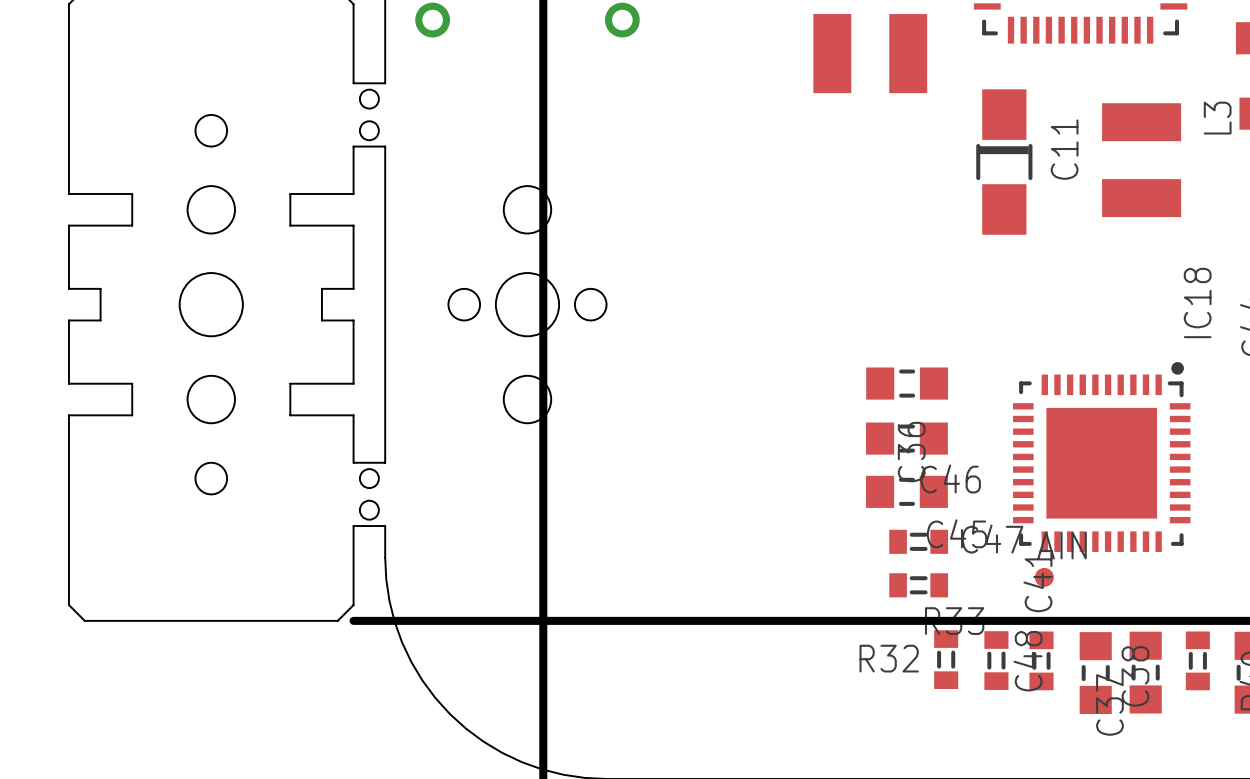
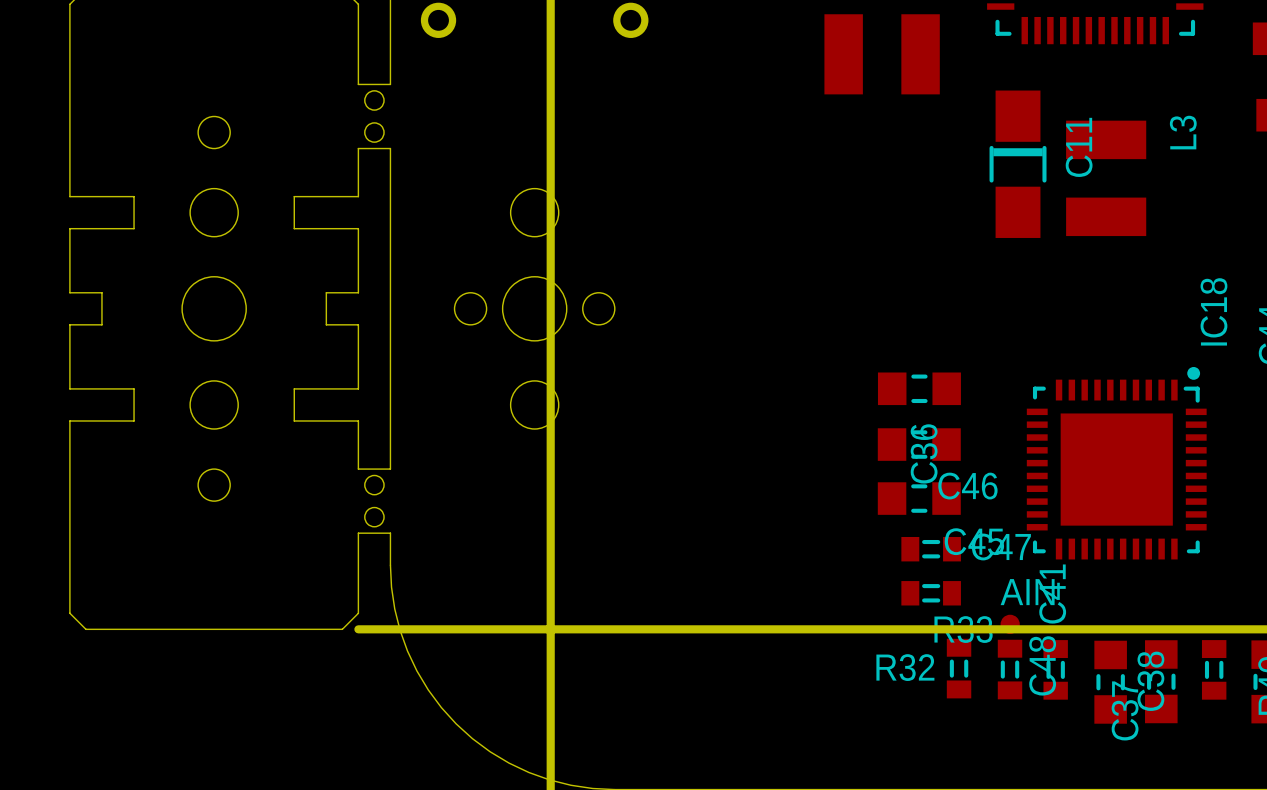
L3 position: (1141, 160) -> (1106, 178)
part position: (1044, 577) -> (1010, 624)

